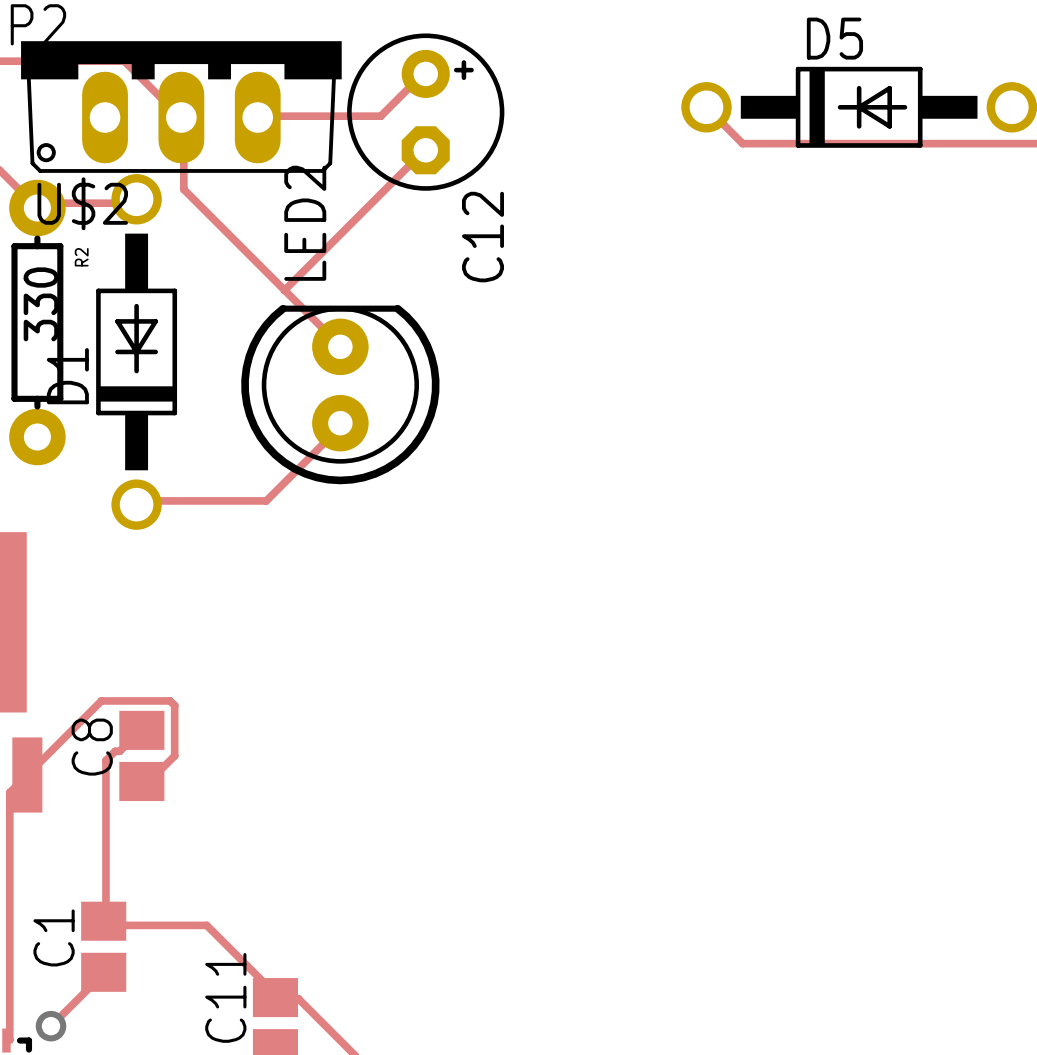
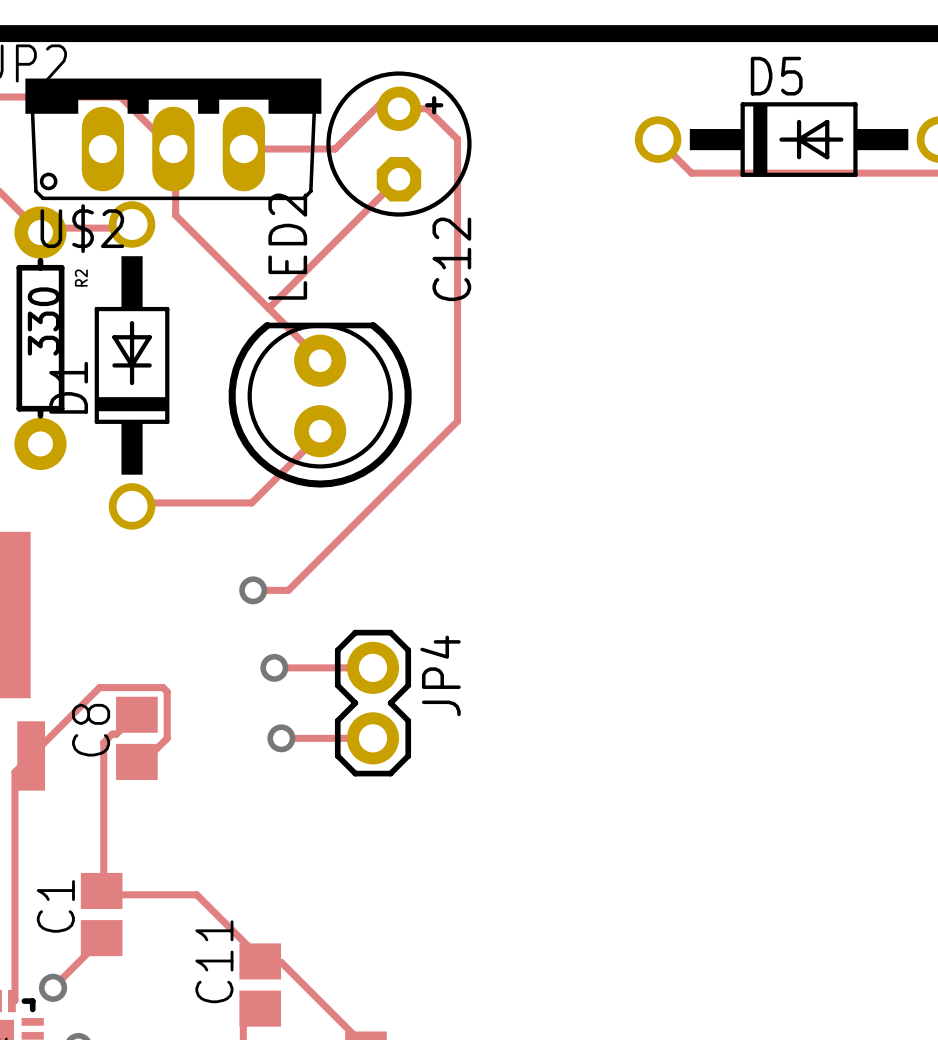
track: (425, 73) (422, 74) (380, 116) (257, 117) -> (253, 590) (288, 590) (457, 421) (457, 139) (427, 108) (398, 108) (394, 104) (380, 104) (335, 149) (243, 149)
via: none -> (253, 590)
track: none -> (274, 667) (372, 667)
via: none -> (274, 667)
JP4: none -> (372, 703)
track: none -> (281, 738) (372, 738)
via: none -> (281, 738)

